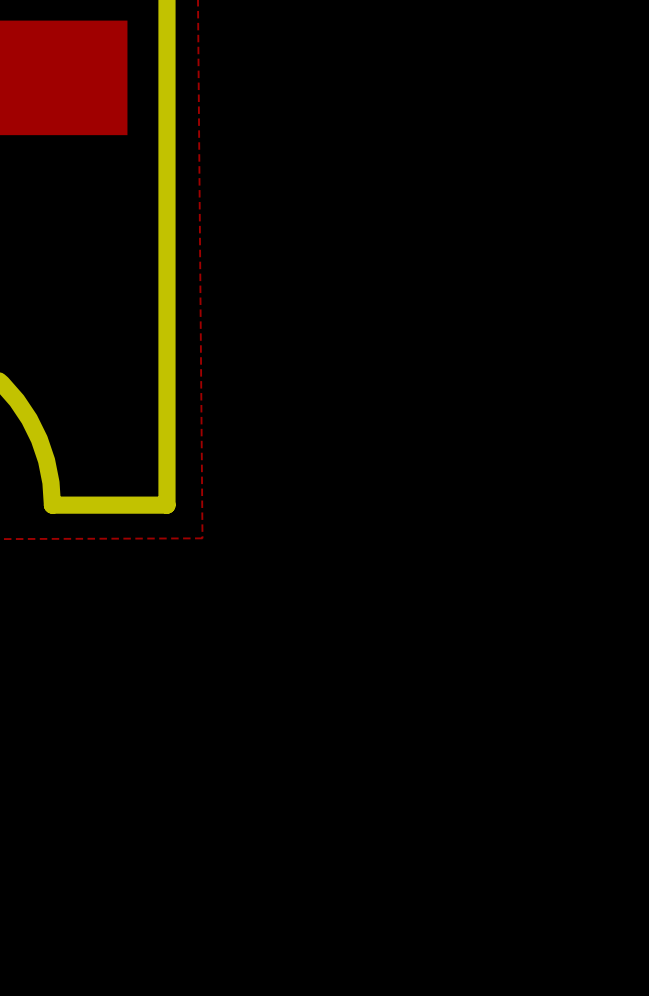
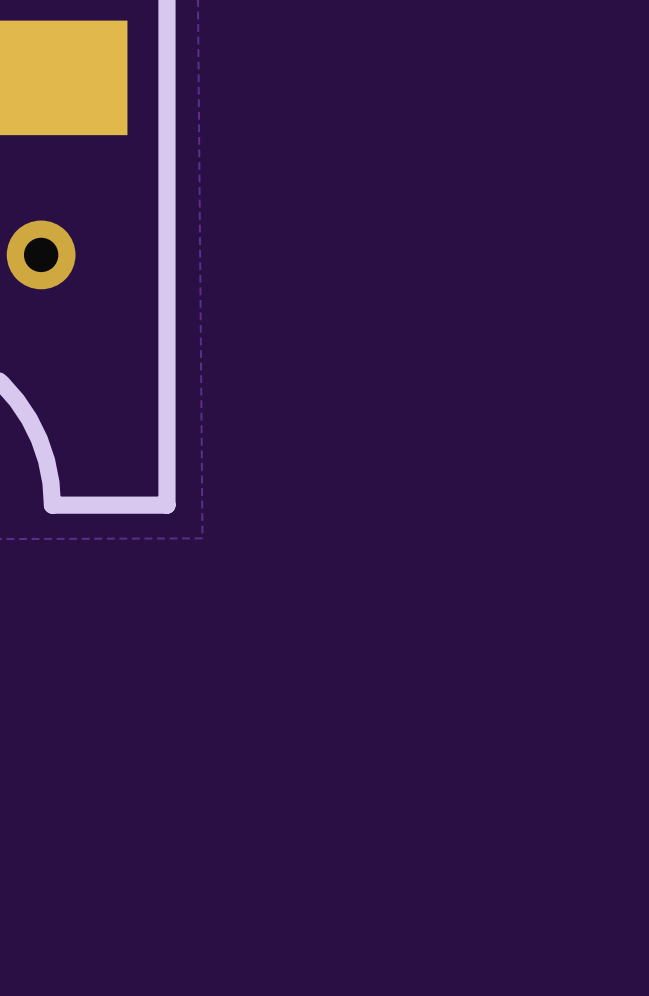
via: none -> (41, 254)

